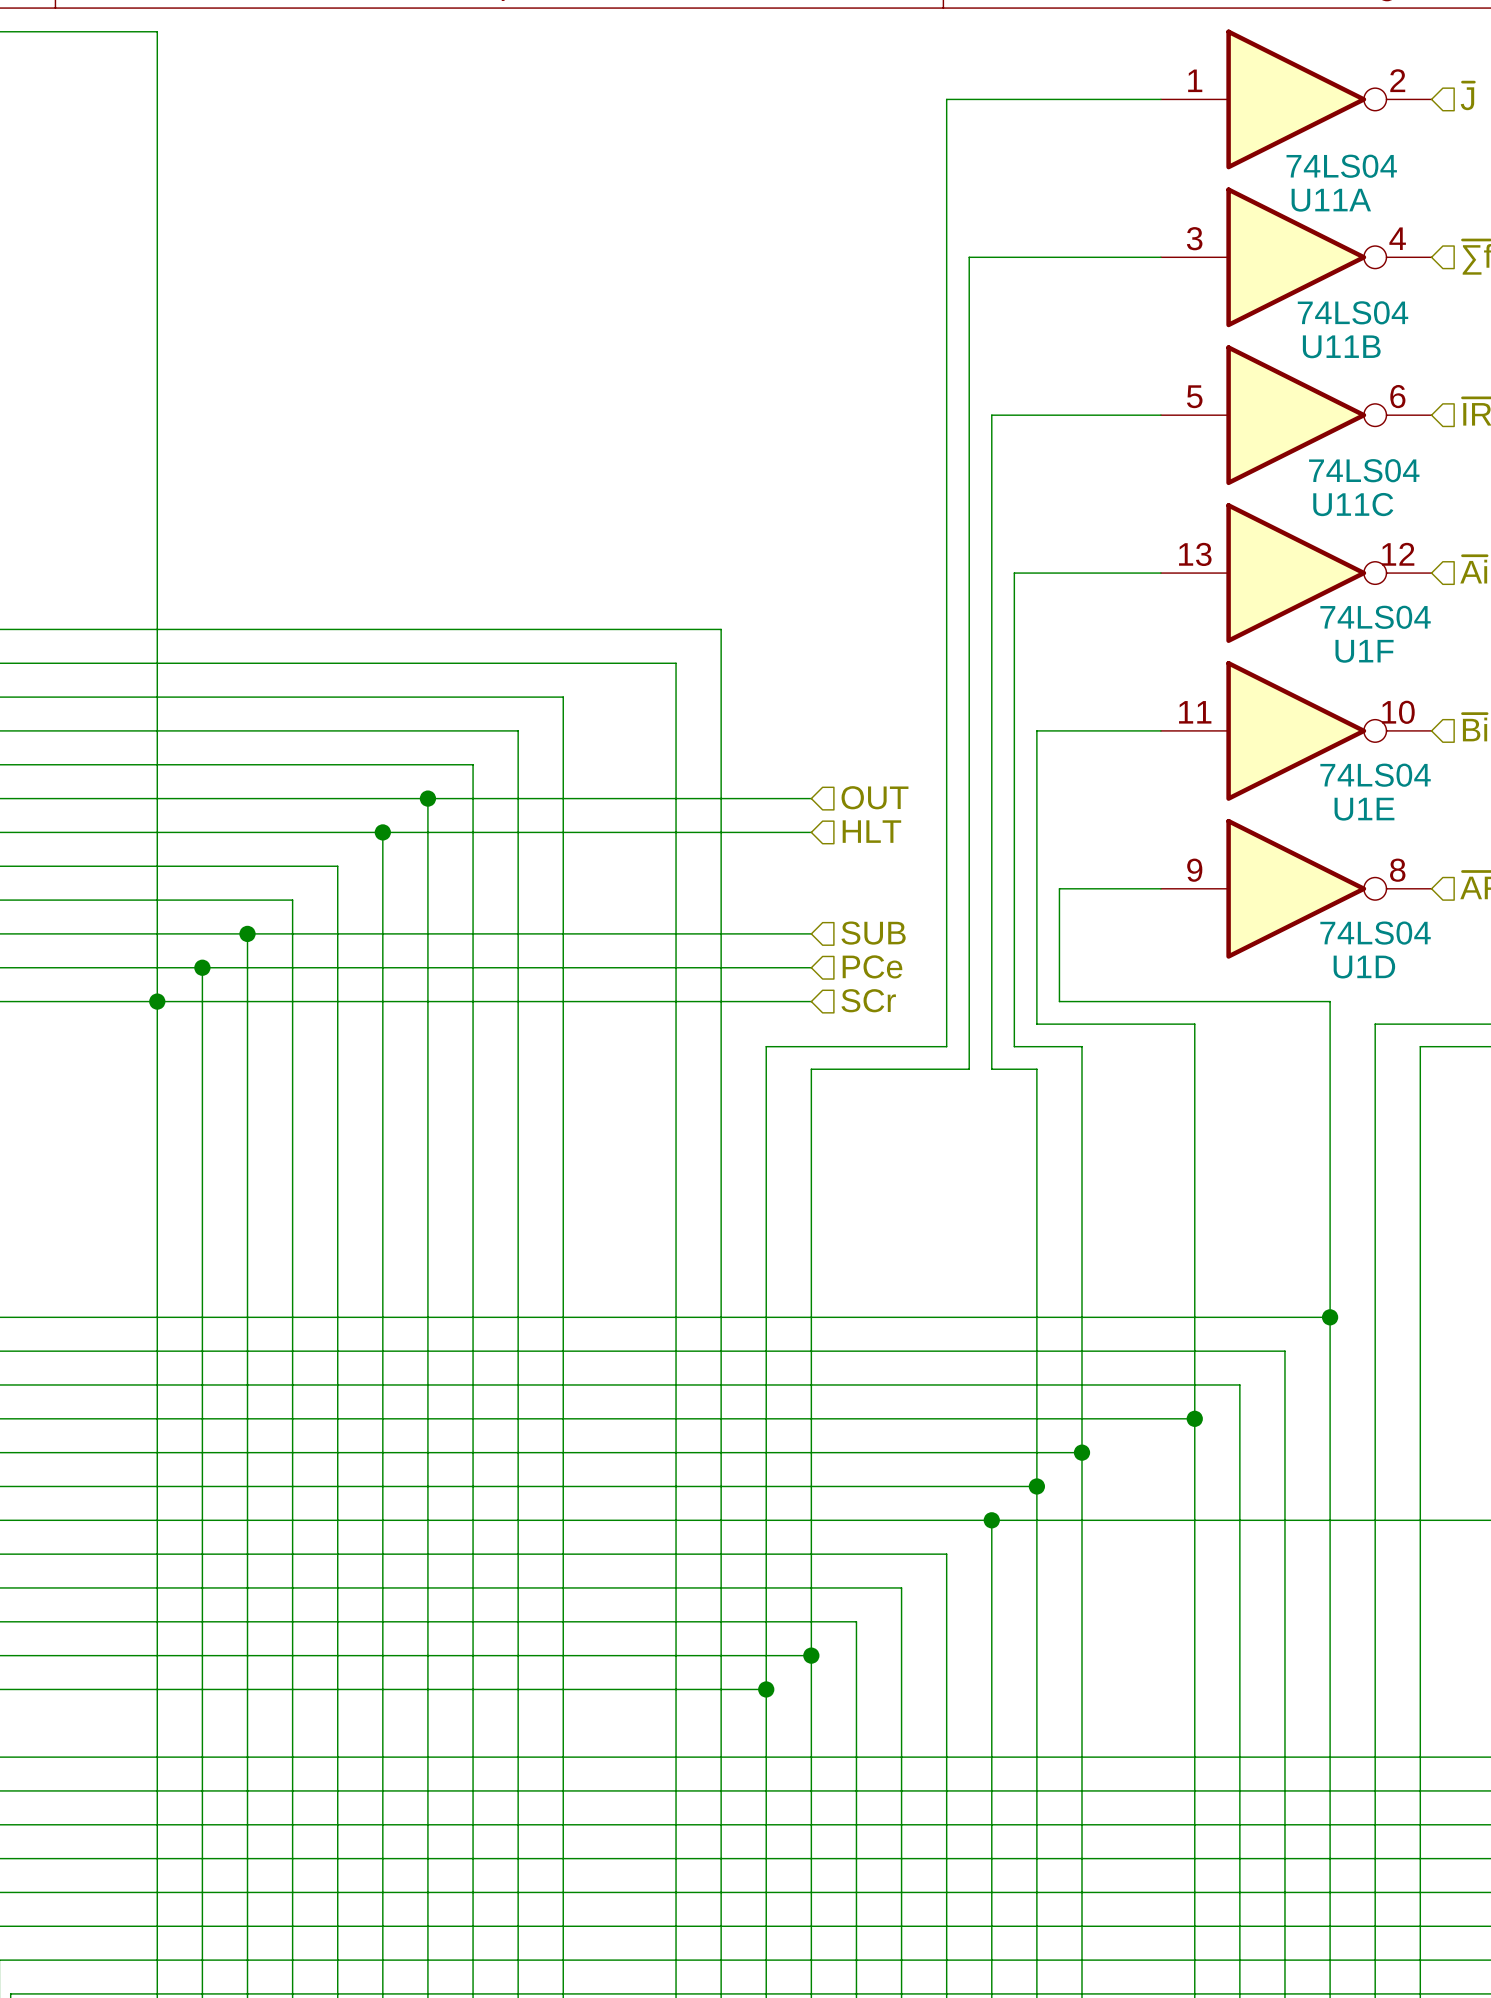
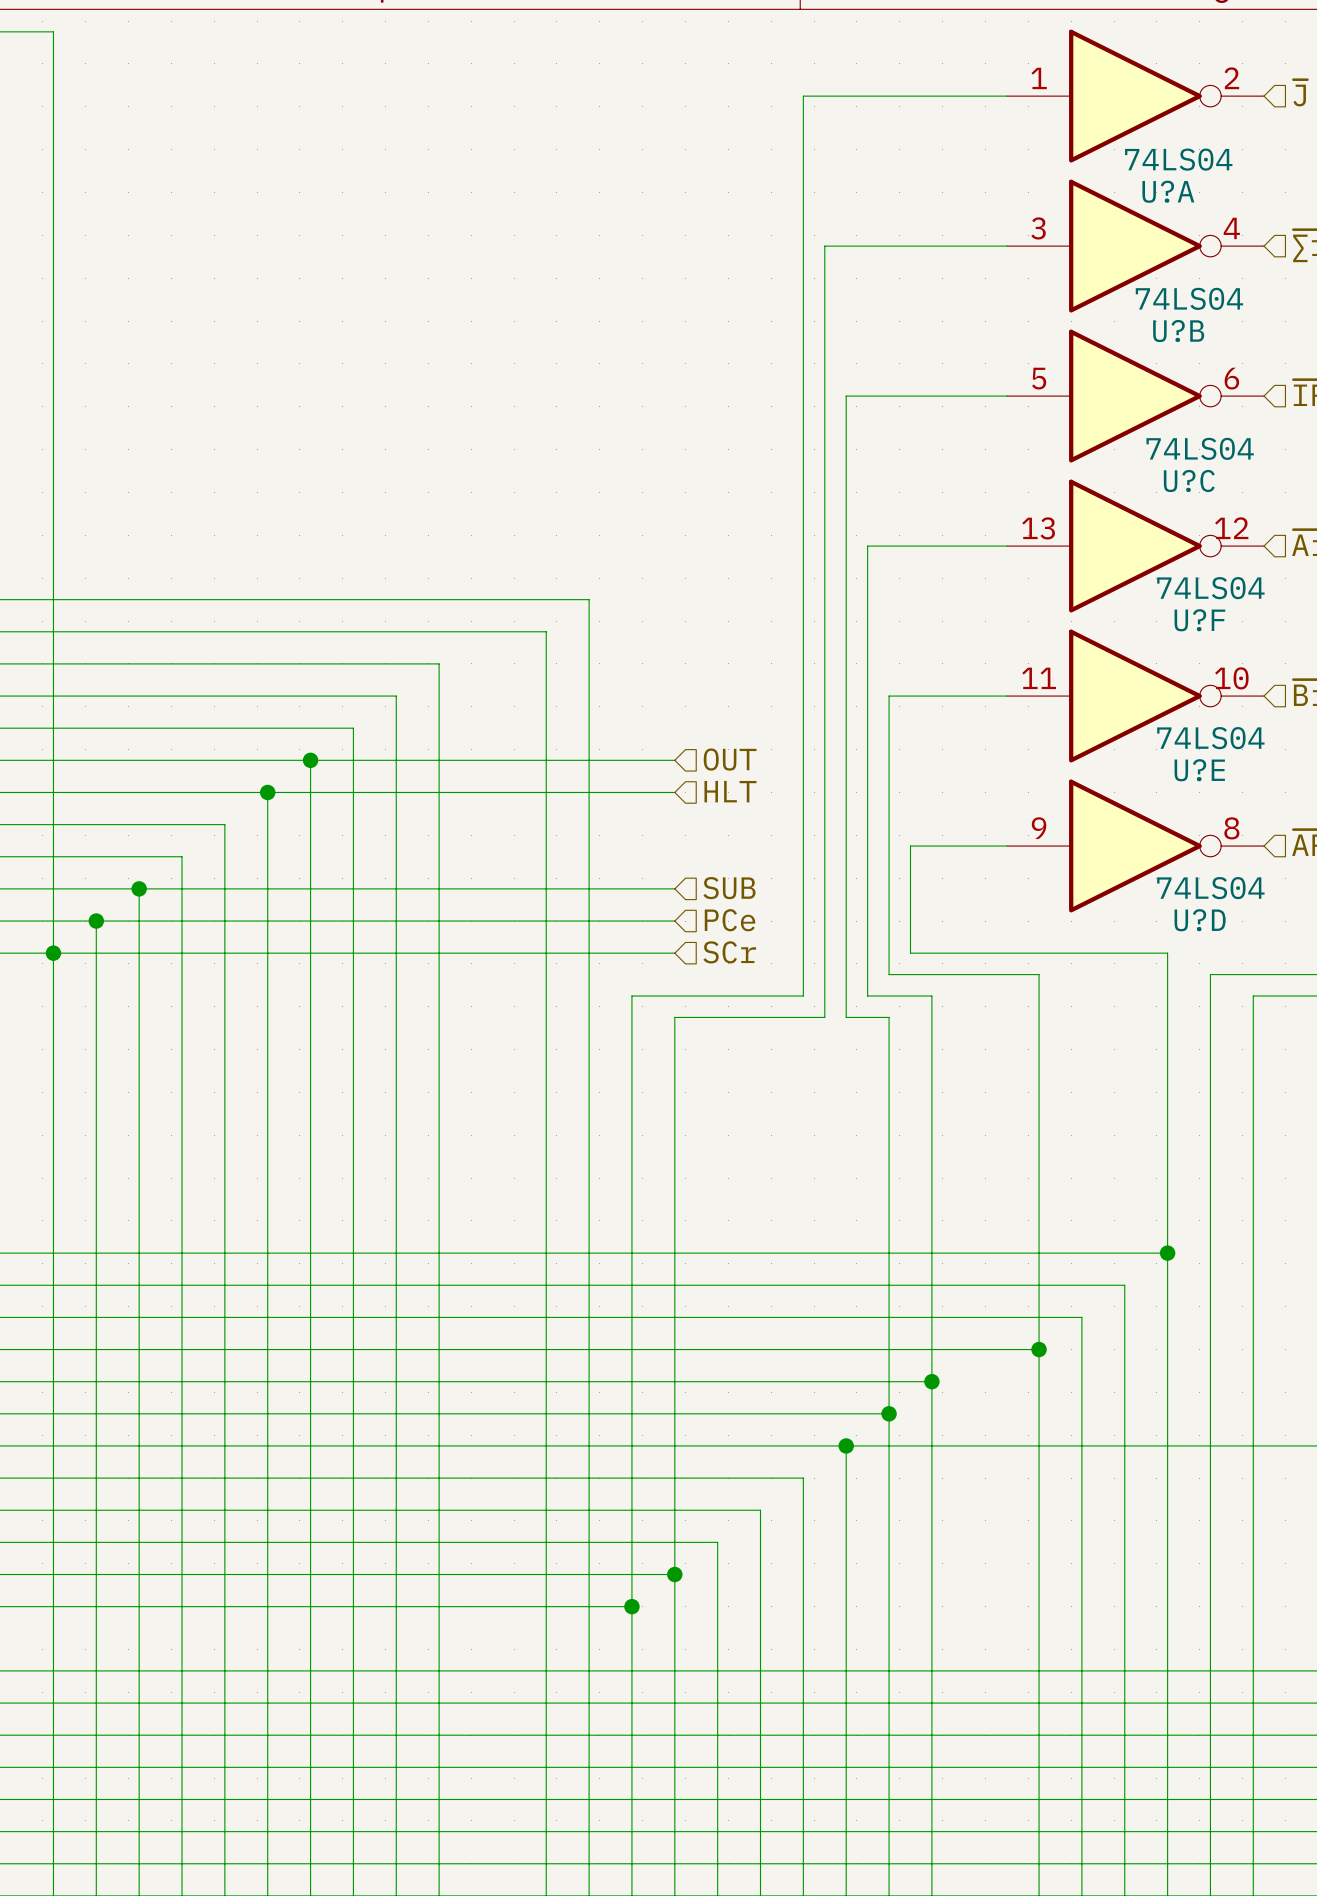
U11A name: U11A (1331, 200) -> U?A (1168, 191)
U11B name: U11B (1341, 346) -> U?B (1178, 331)
U11C name: U11C (1353, 504) -> U?C (1189, 480)
U1F name: U1F (1364, 651) -> U?F (1199, 620)
U1E name: U1E (1364, 809) -> U?E (1199, 770)
U1D name: U1D (1364, 967) -> U?D (1200, 920)

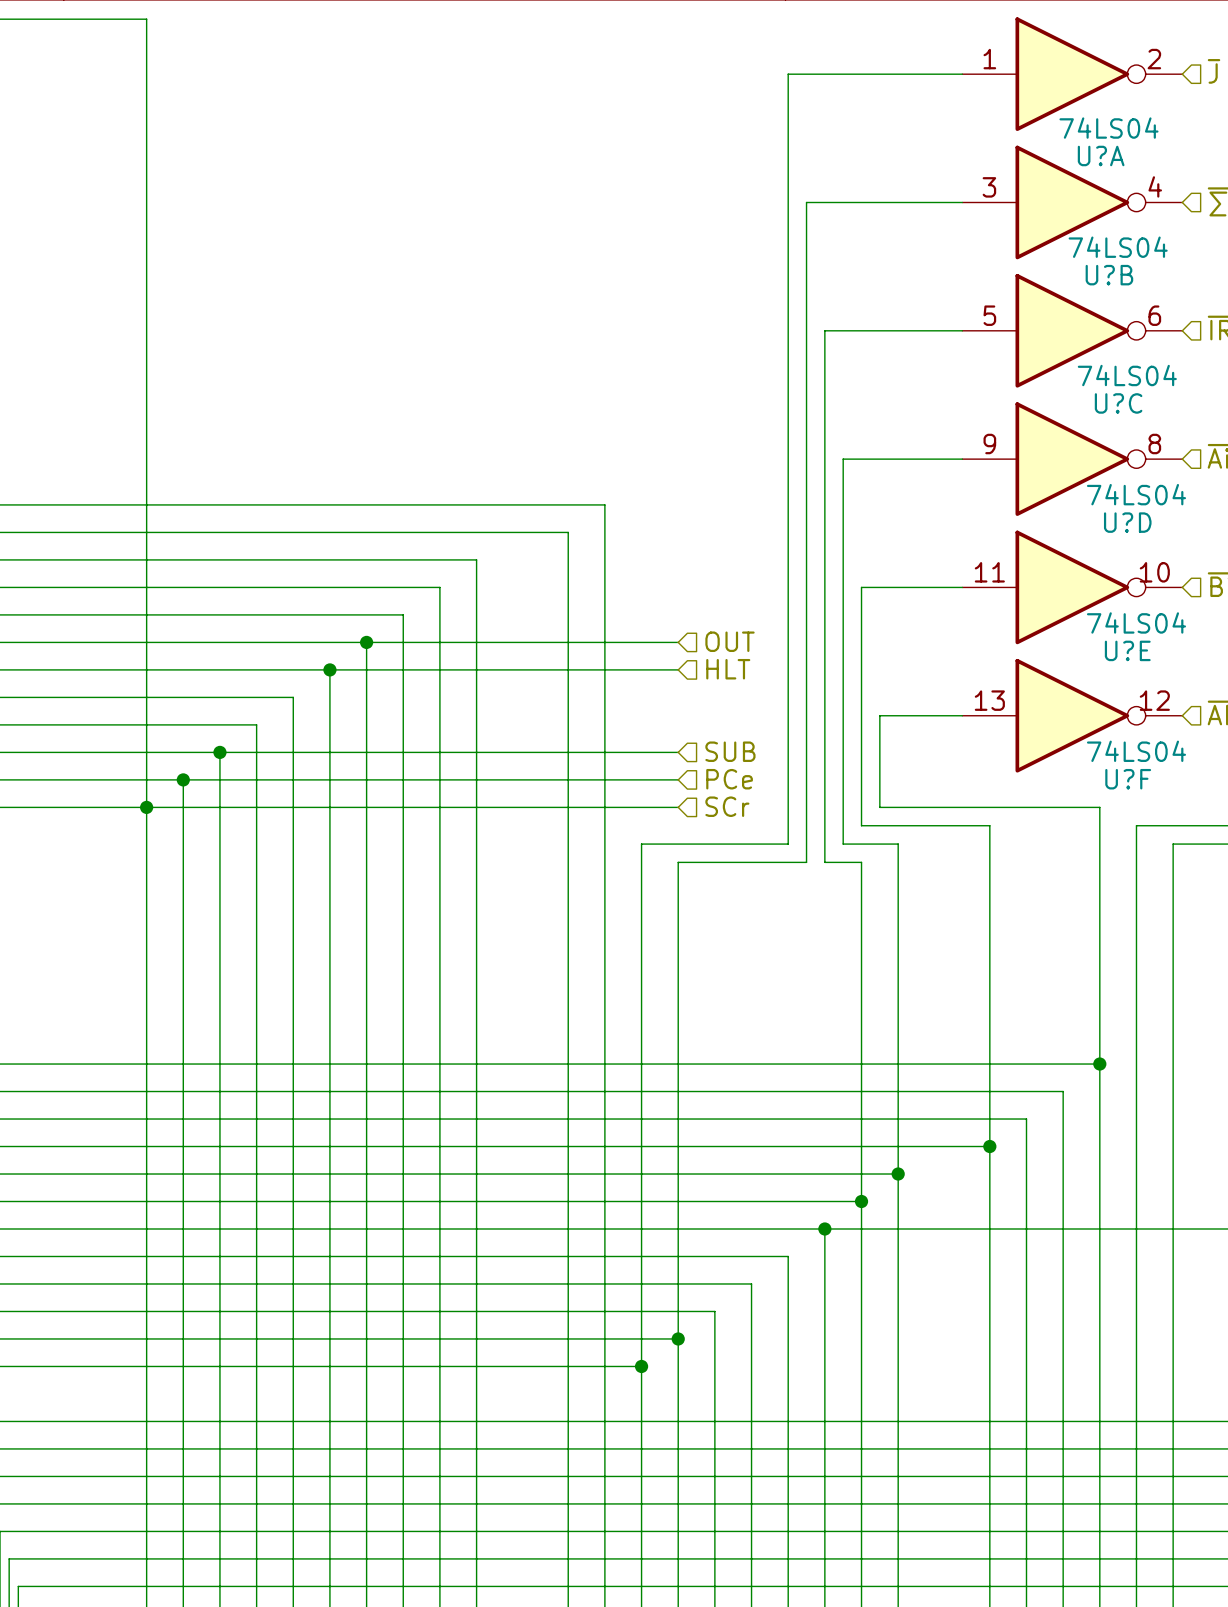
U?F pin number: 13 (1038, 528) -> 9 (989, 444)
U?F pin number: 12 (1231, 528) -> 8 (1154, 444)
U?F name: U?F (1199, 620) -> U?D (1127, 522)
U?D pin number: 9 (1039, 828) -> 13 (989, 700)
U?D pin number: 8 (1231, 828) -> 12 (1154, 700)
U?D name: U?D (1200, 920) -> U?F (1128, 779)

